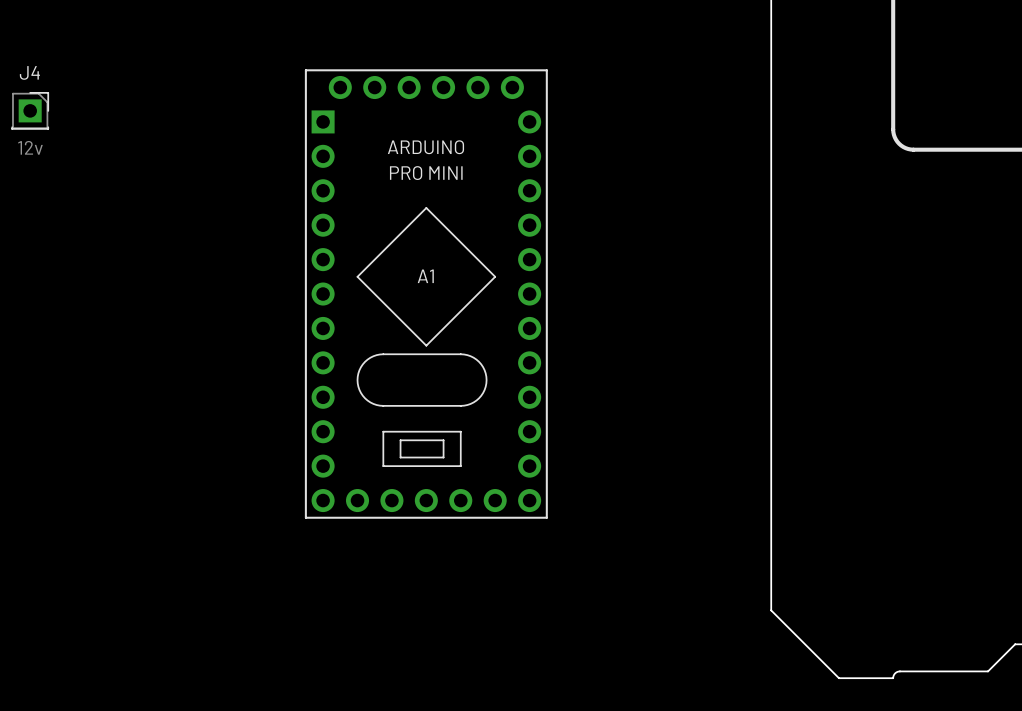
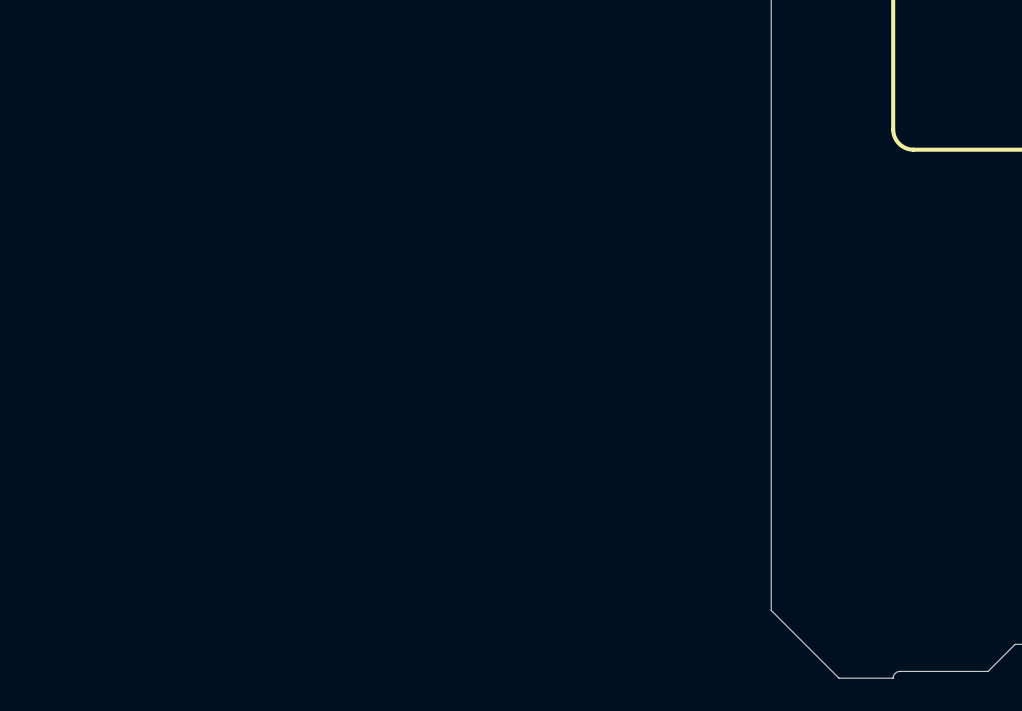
J4: 12v (30, 110) -> none
A1: ARDUINO (426, 294) -> none

